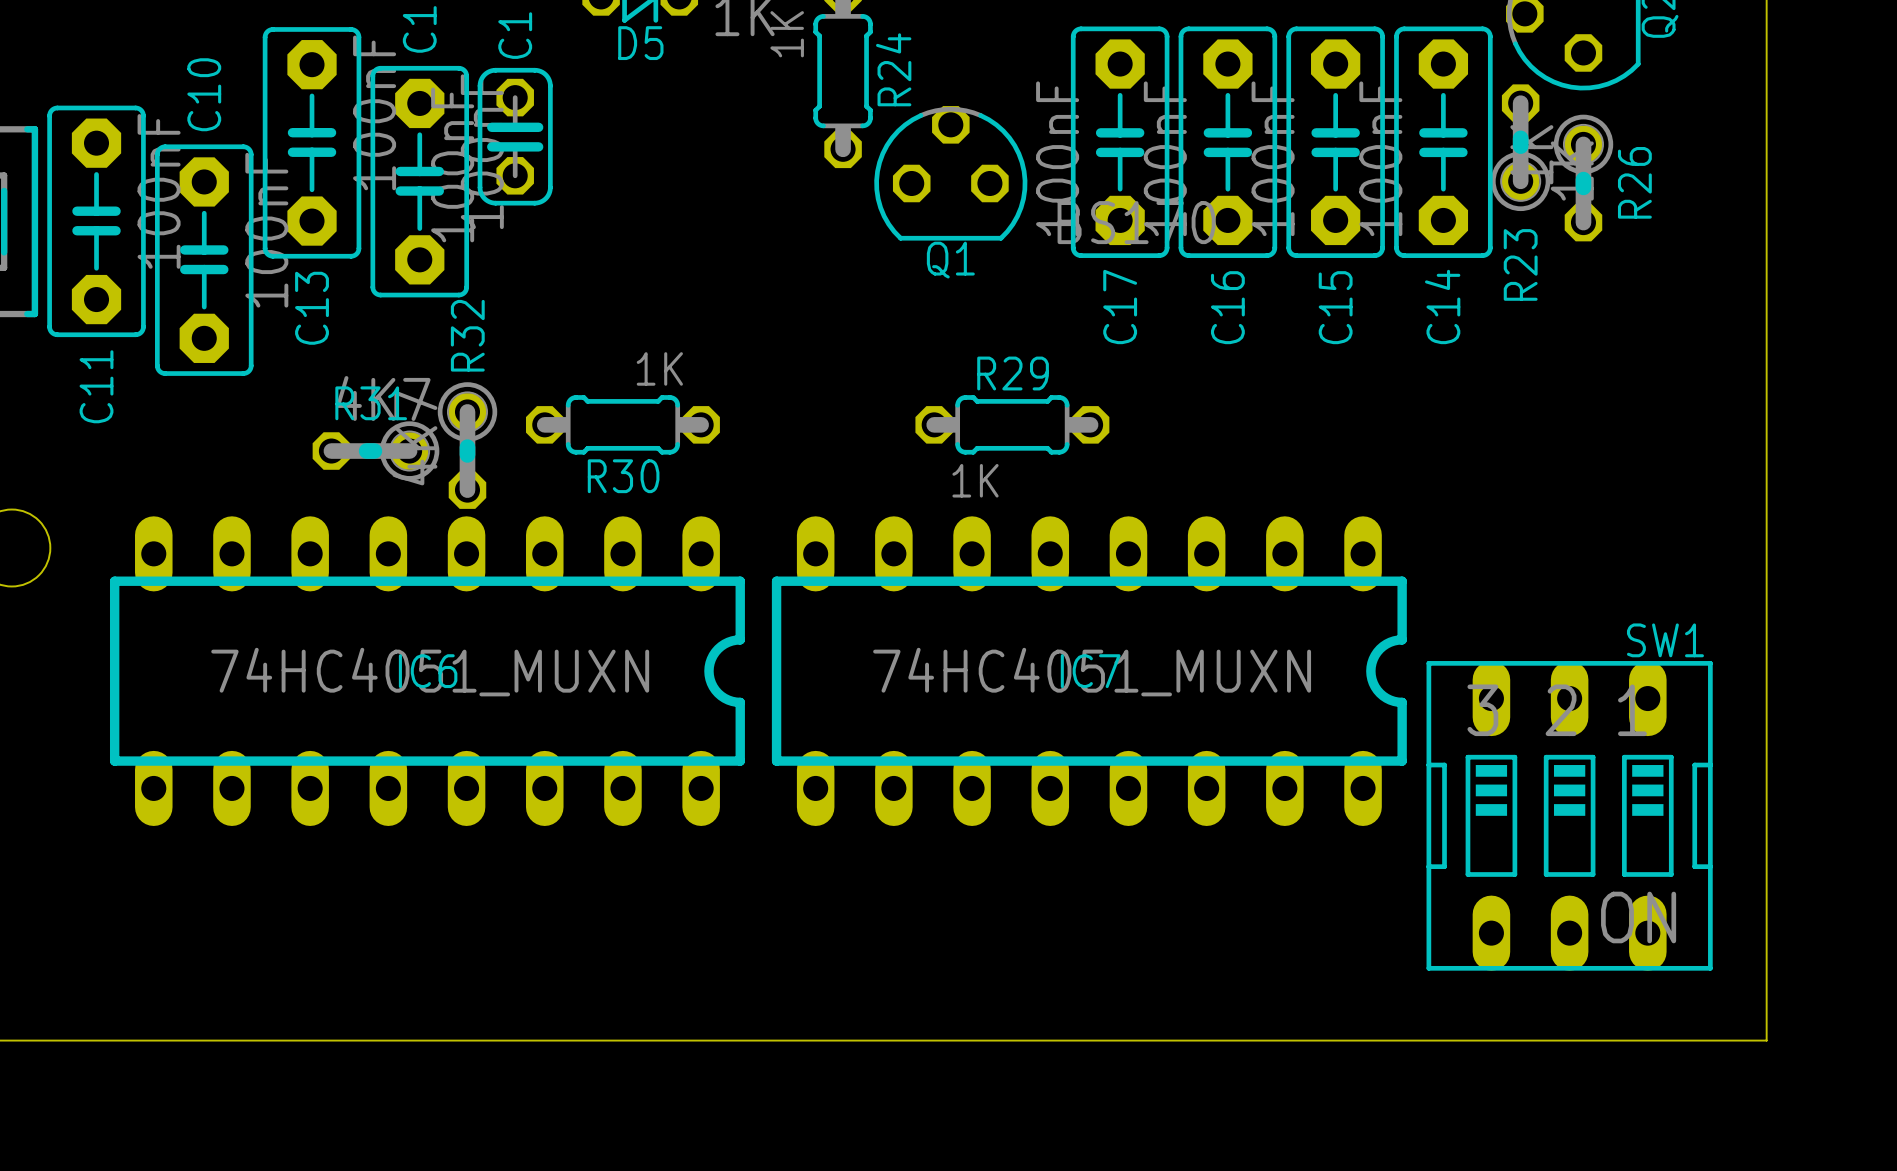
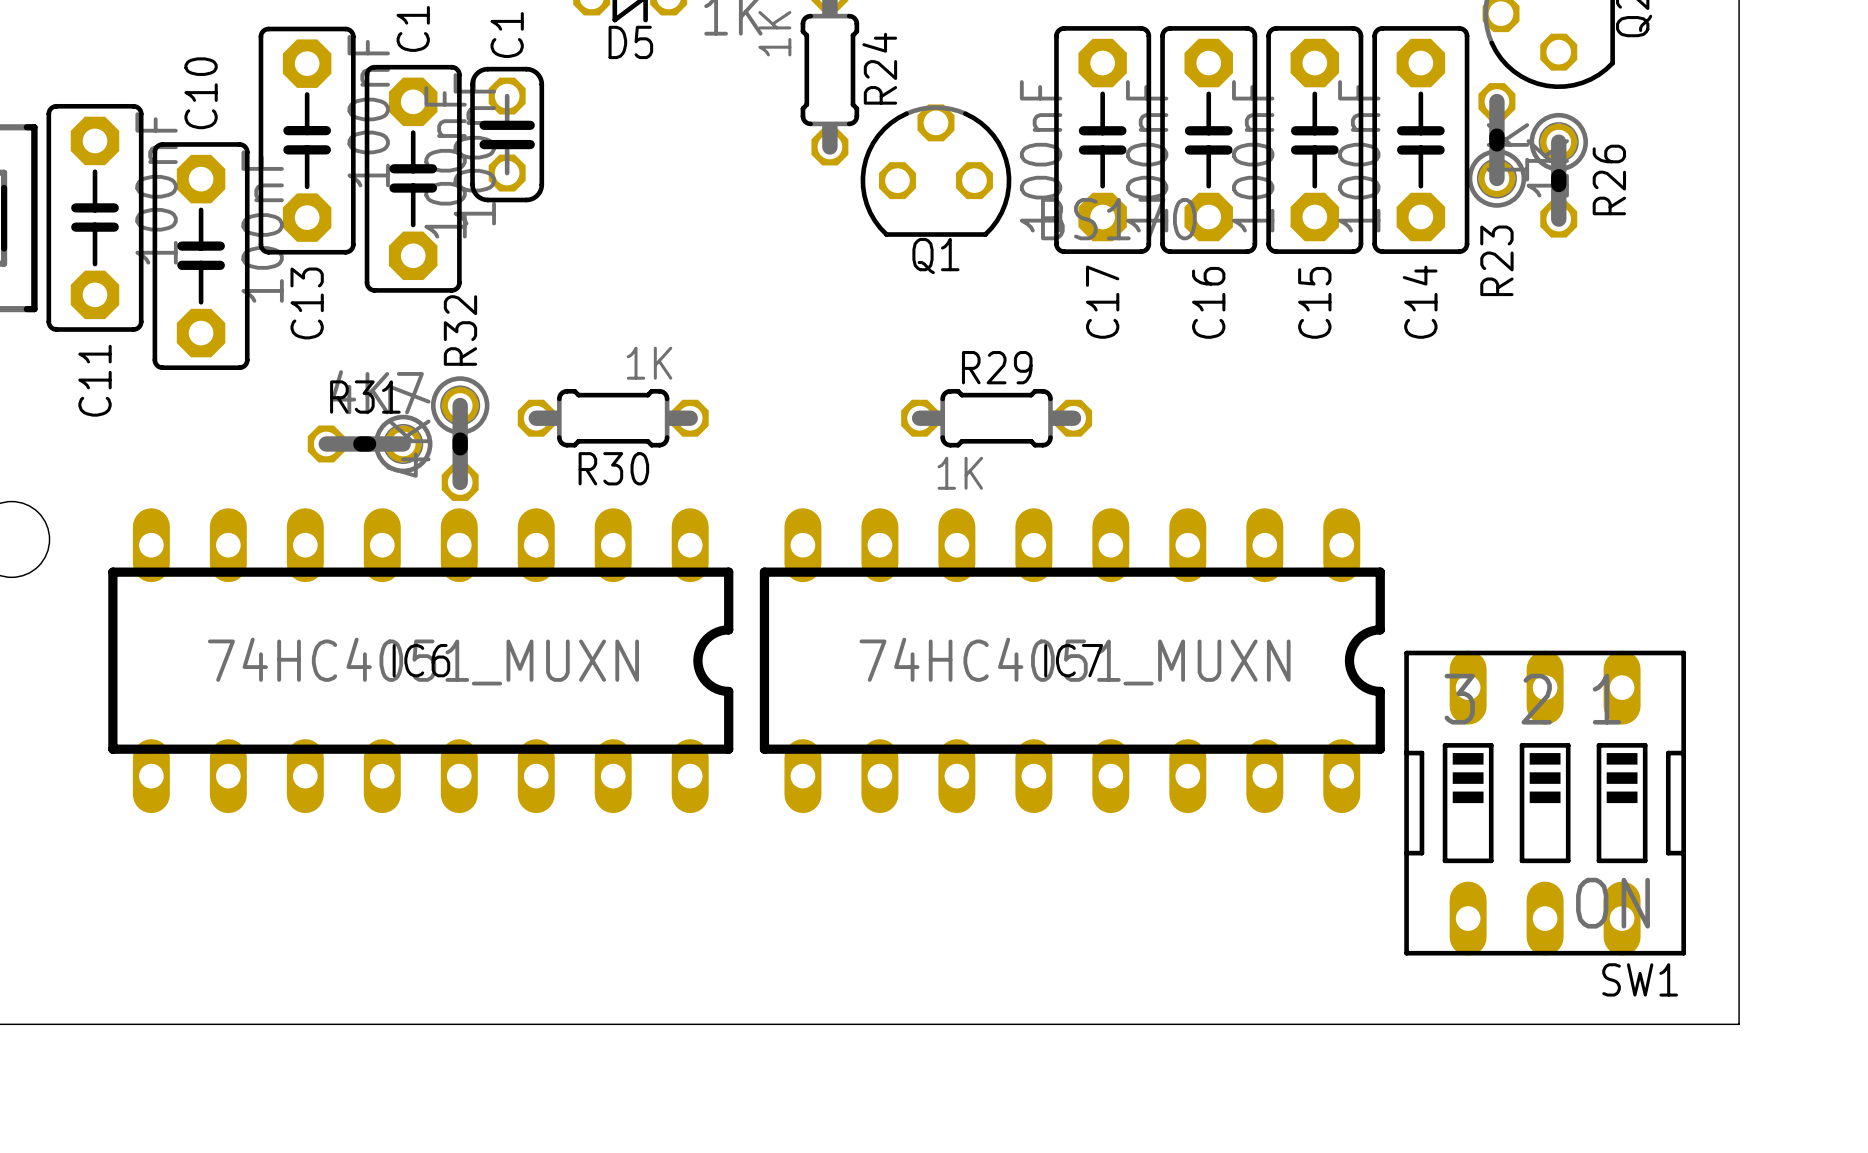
SW1 name position: SW1 (1665, 640) -> SW1 (1640, 979)

